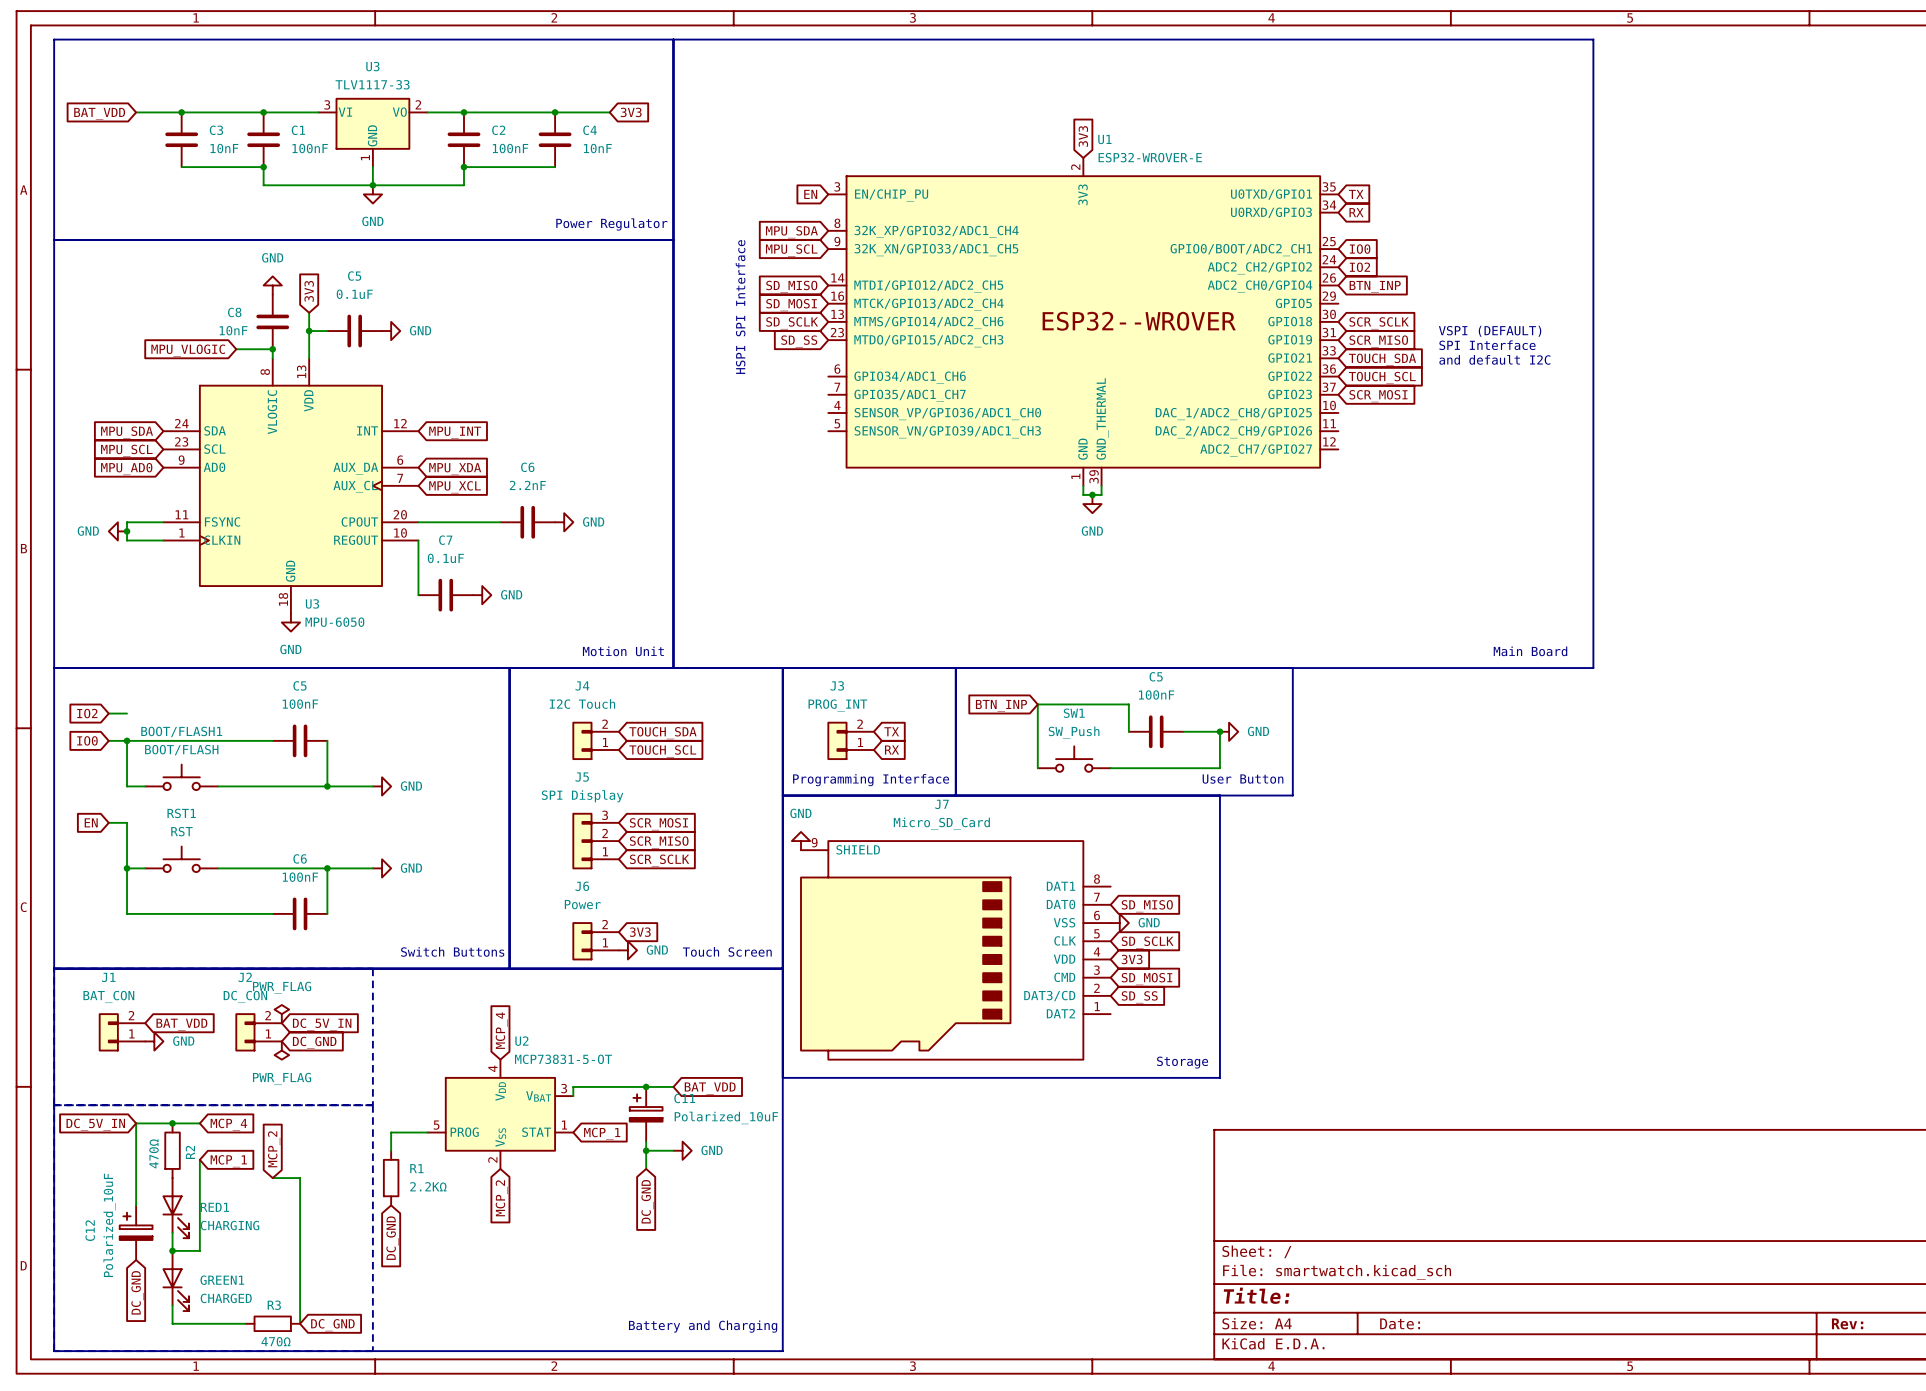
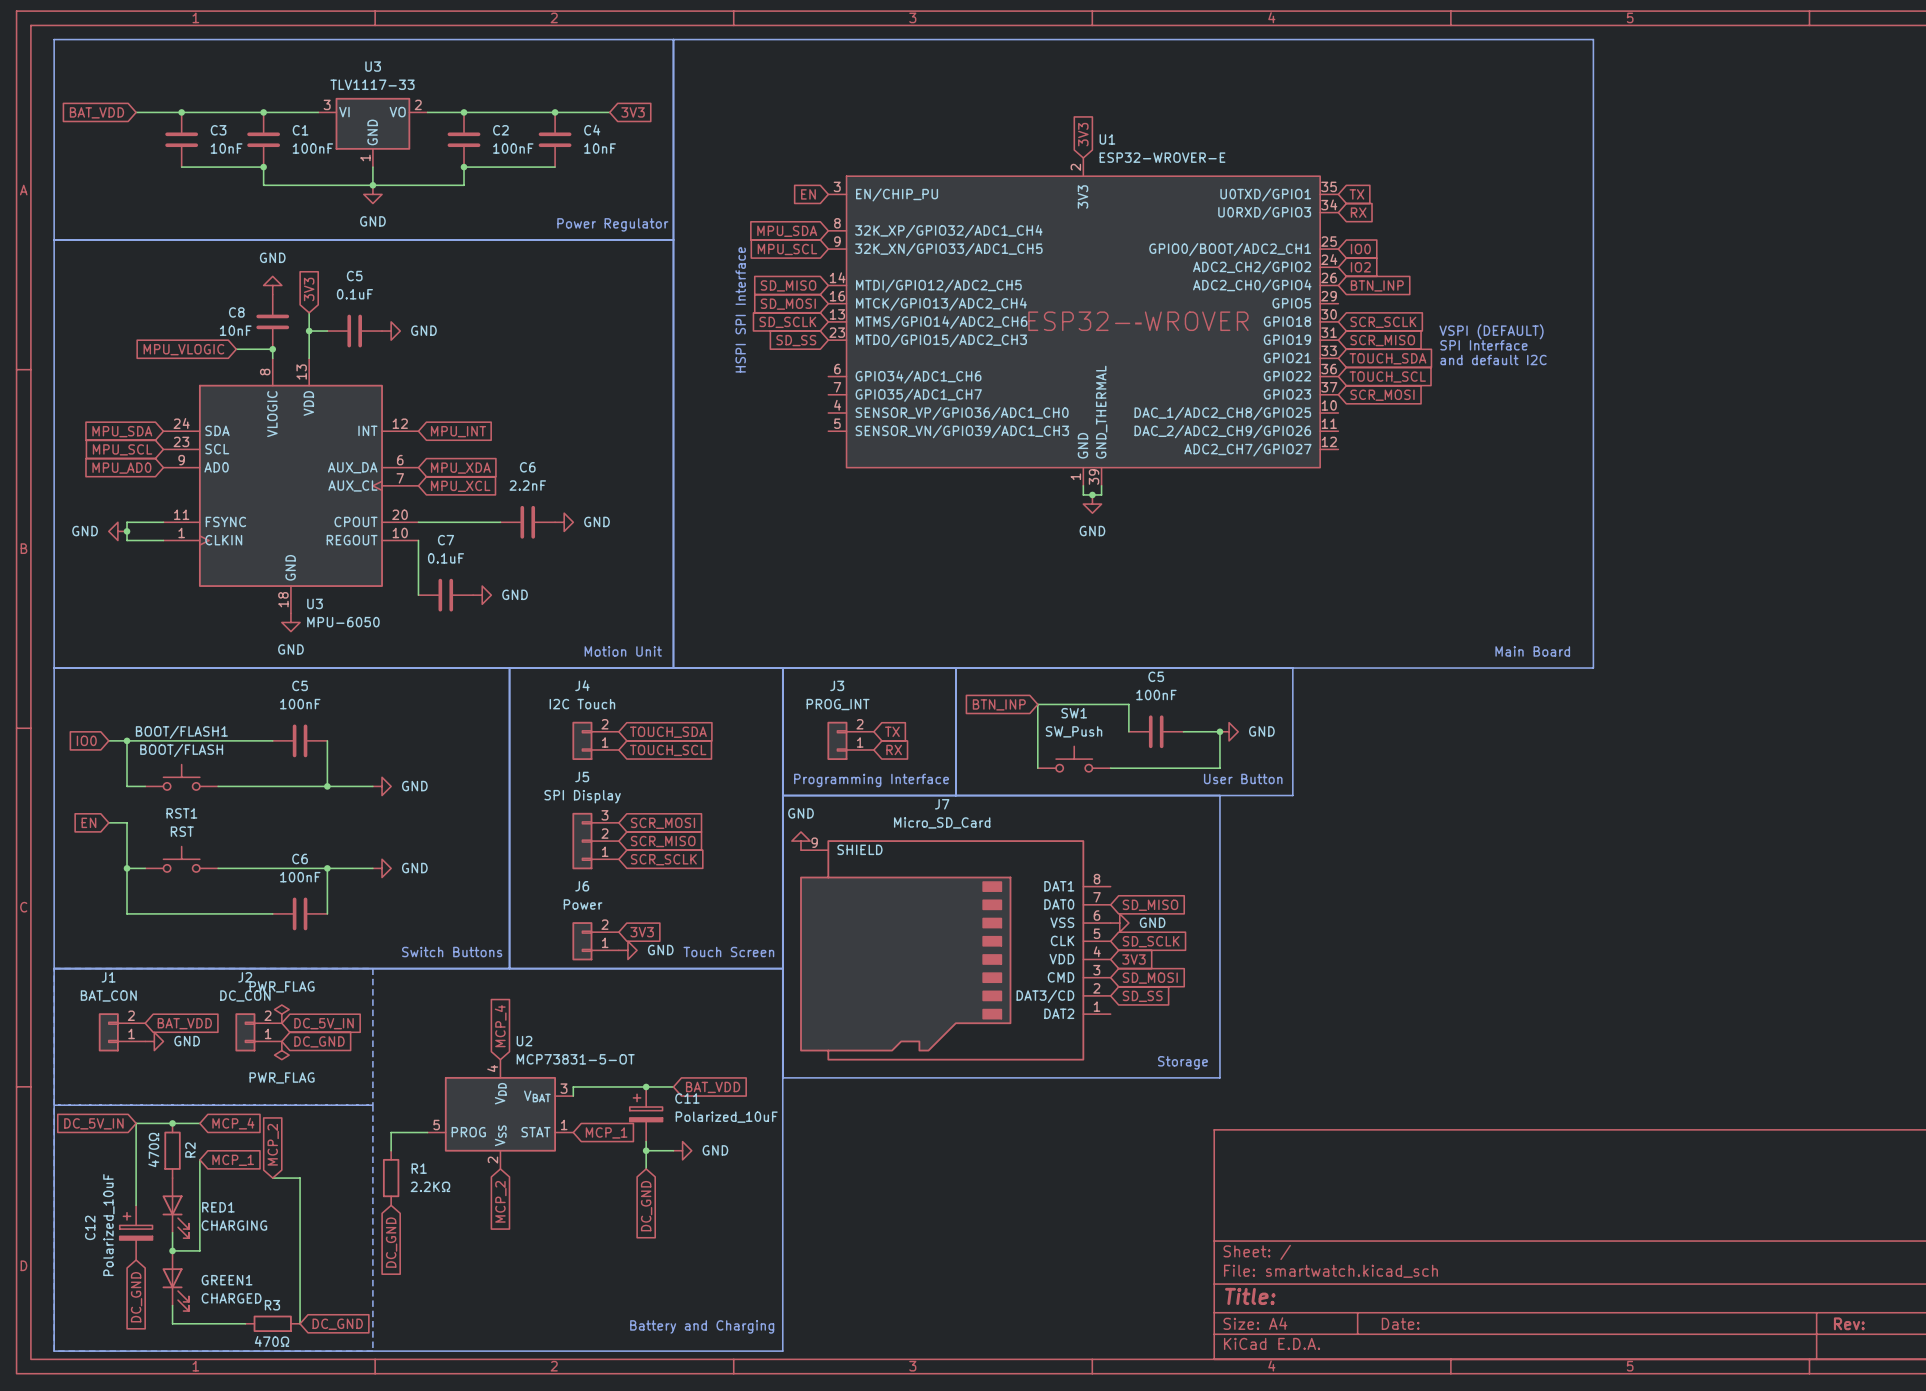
global label: IO2 (87, 713) -> none
wire: (108, 713) (127, 713) -> none

